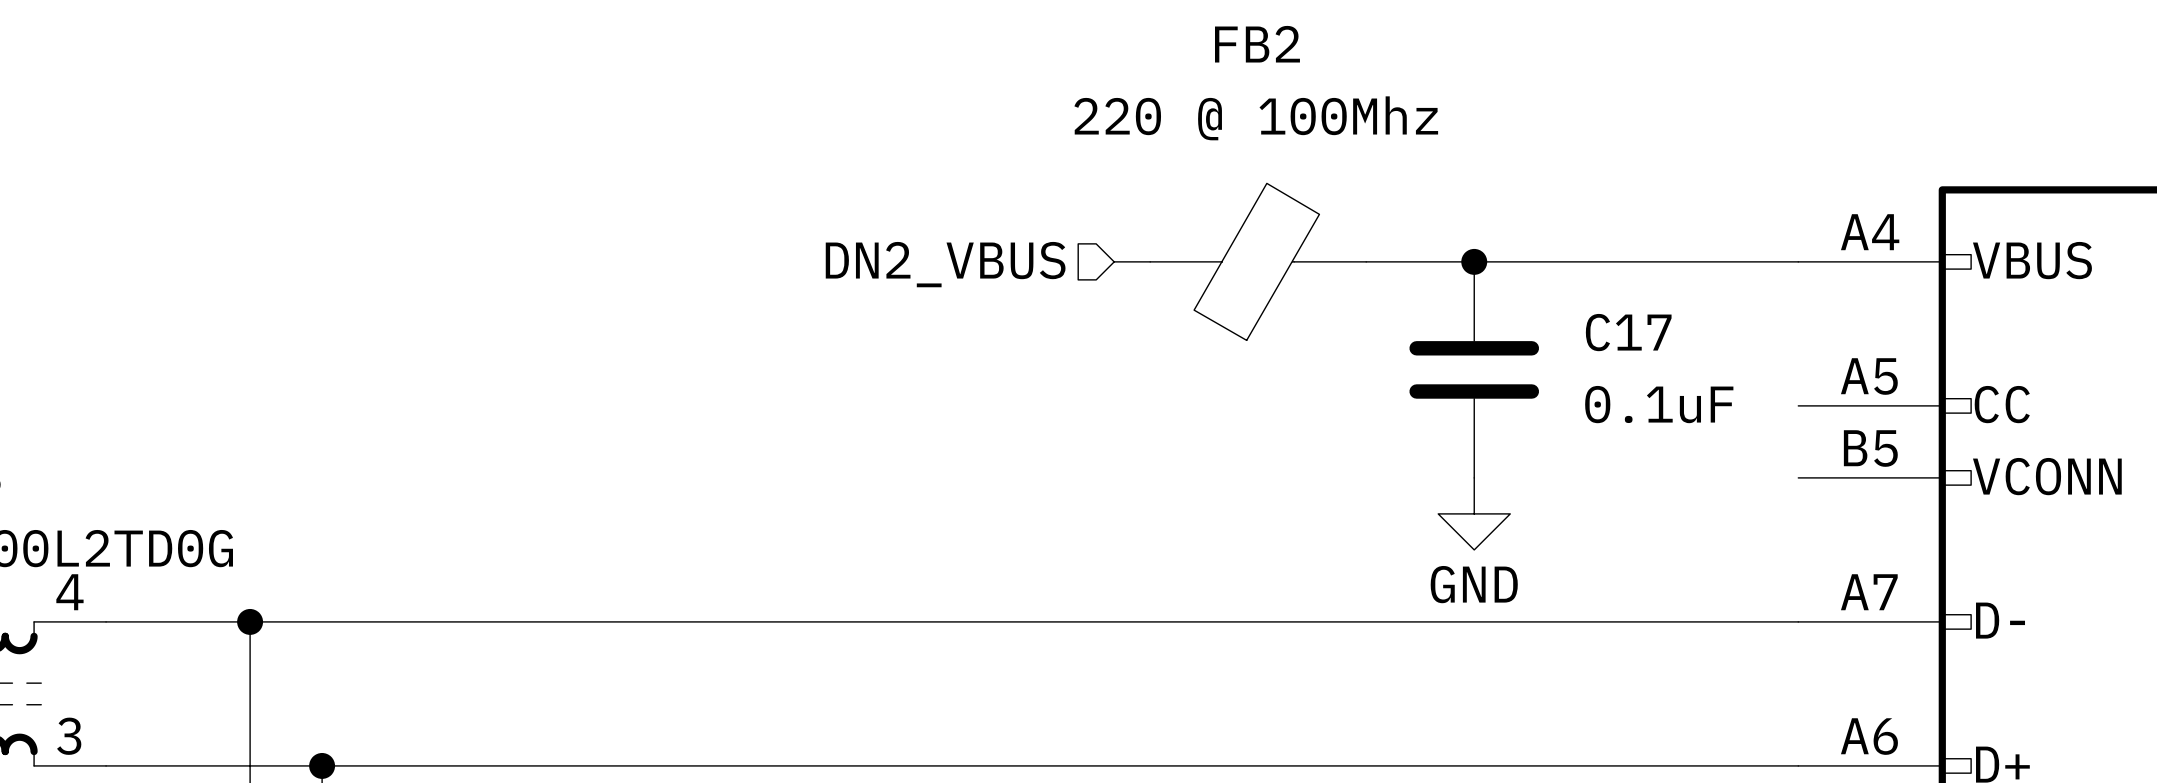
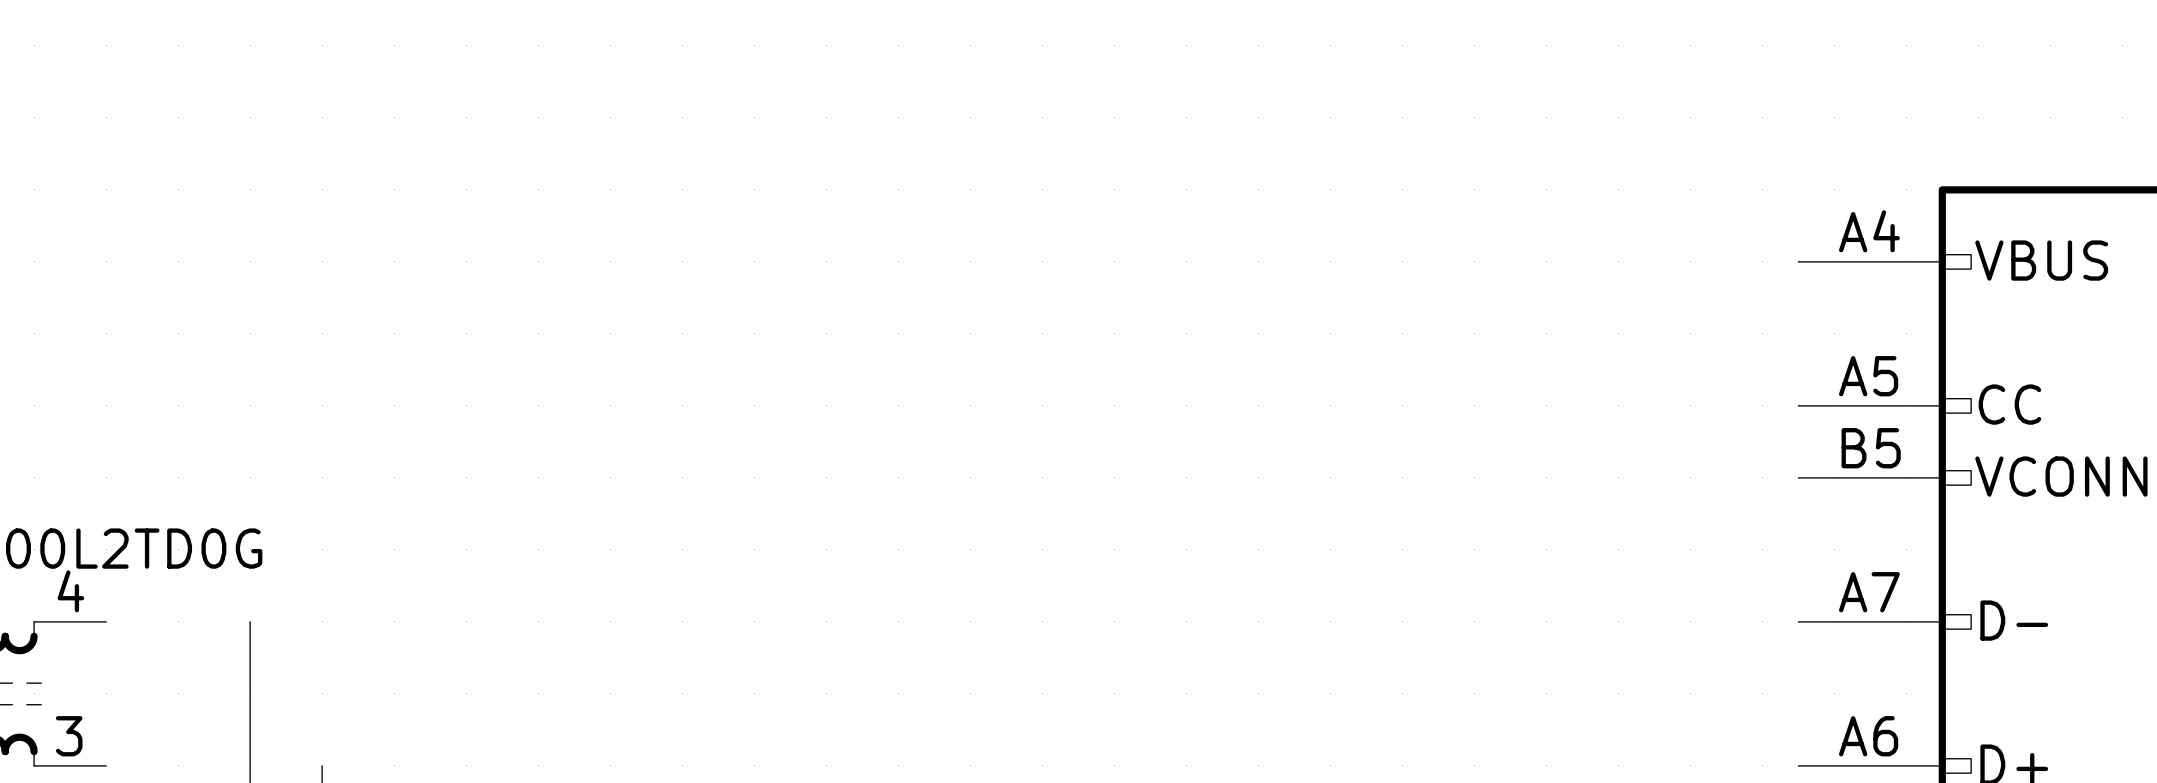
wire: (1114, 261) (1150, 261) -> none
FB2: 220 @ 100Mhz (1258, 261) -> none
wire: (1366, 261) (1798, 261) -> none
junction: (1474, 261) -> none
hierarchical label: DN2_VBUS (945, 264) -> none
C17: 0.1uF (1474, 369) -> none
power symbol: GND (1474, 513) -> none
wire: (106, 621) (1798, 621) -> none
junction: (250, 621) -> none
wire: (106, 765) (1798, 765) -> none
junction: (322, 765) -> none

